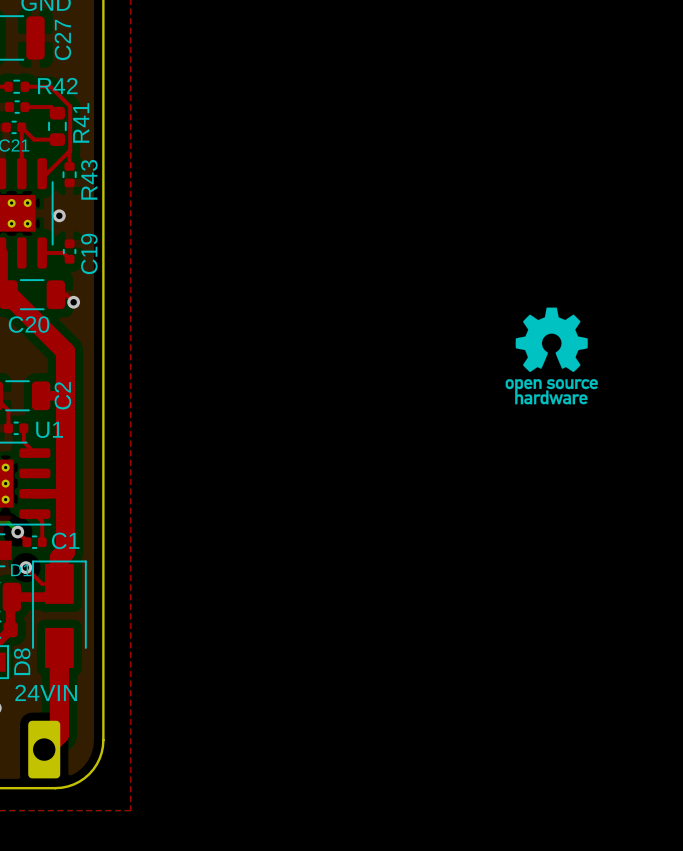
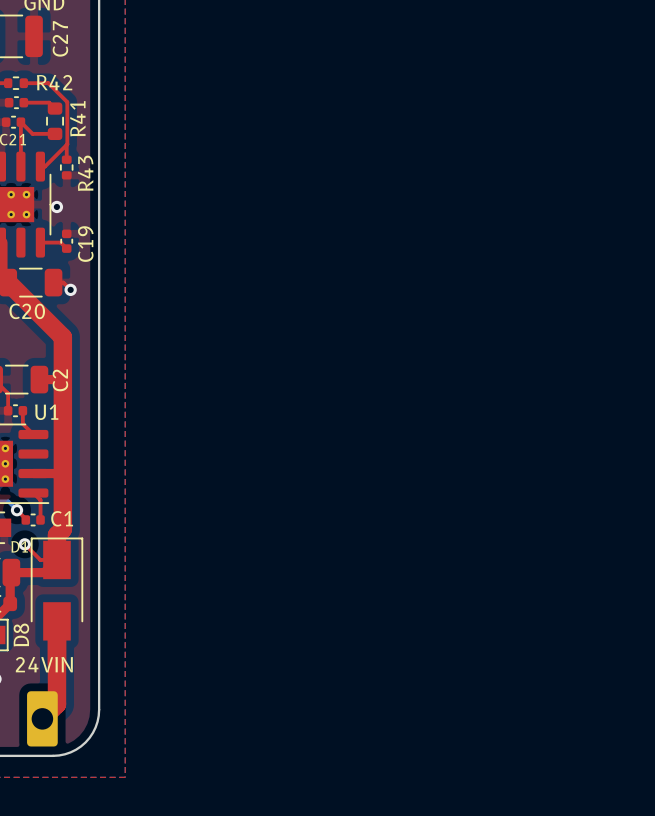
drawing: [505, 307, 598, 405] -> none

